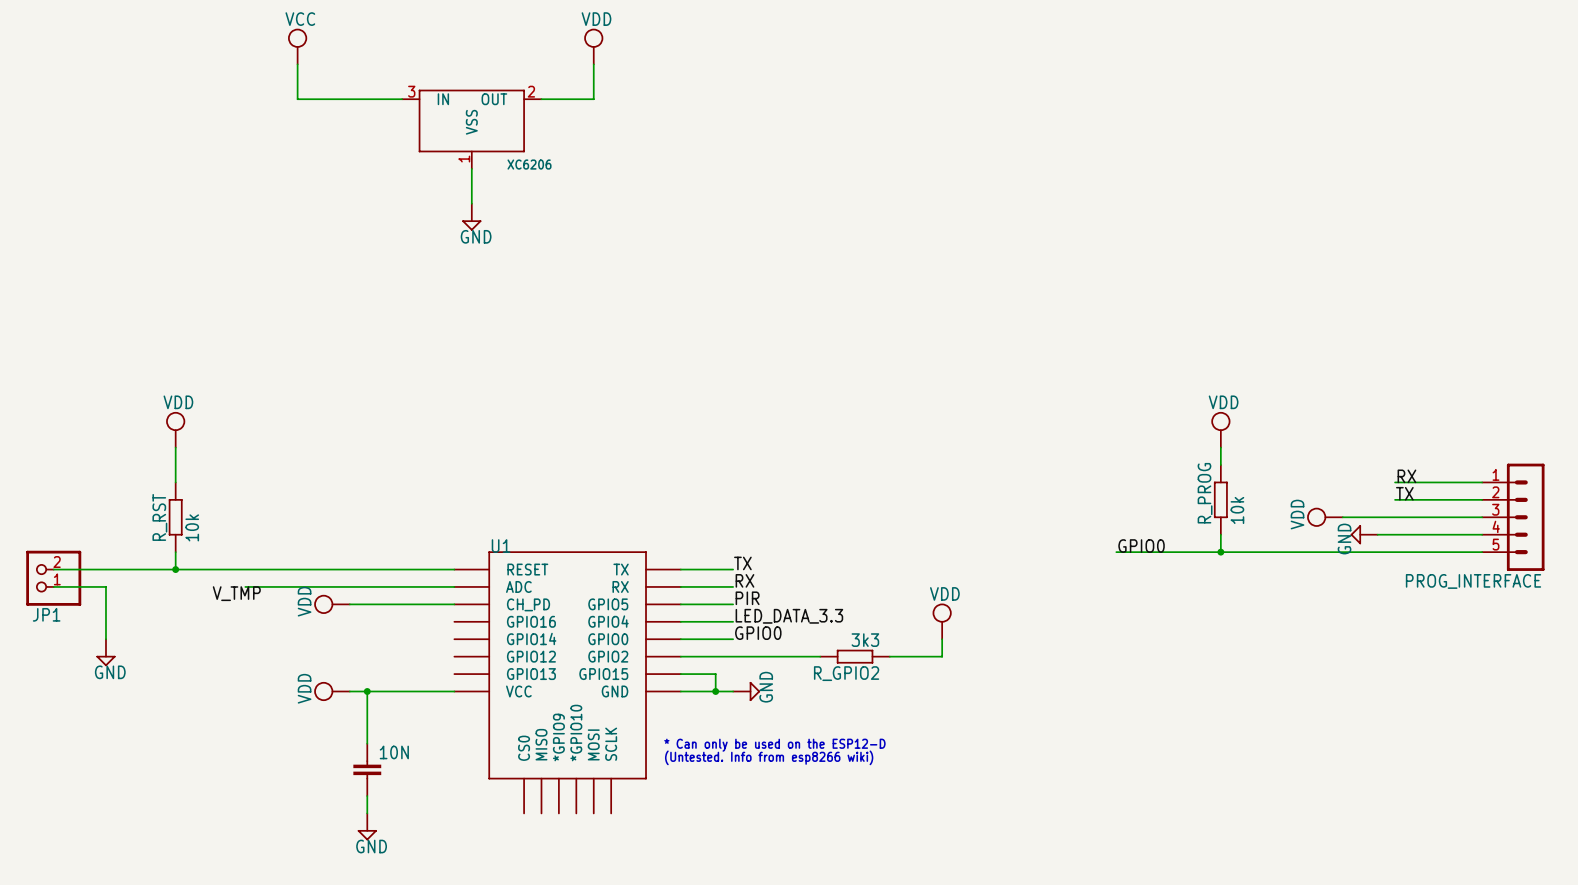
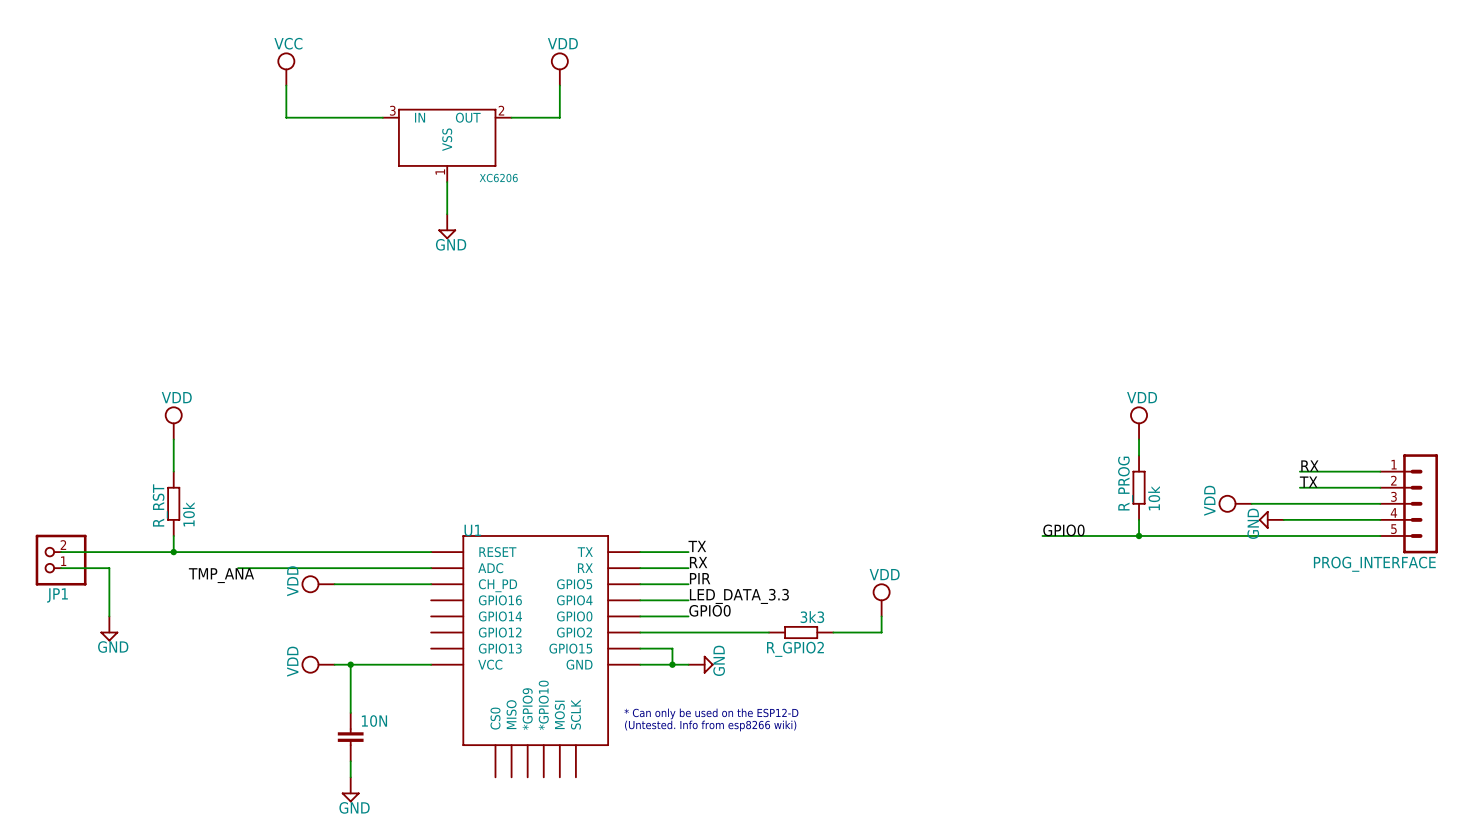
label: V_TMP (236, 593) -> TMP_ANA (221, 575)

